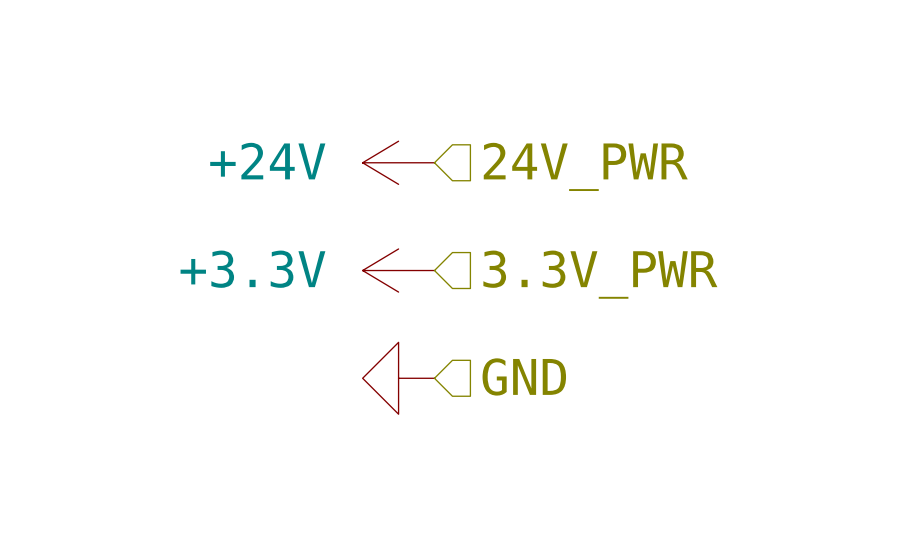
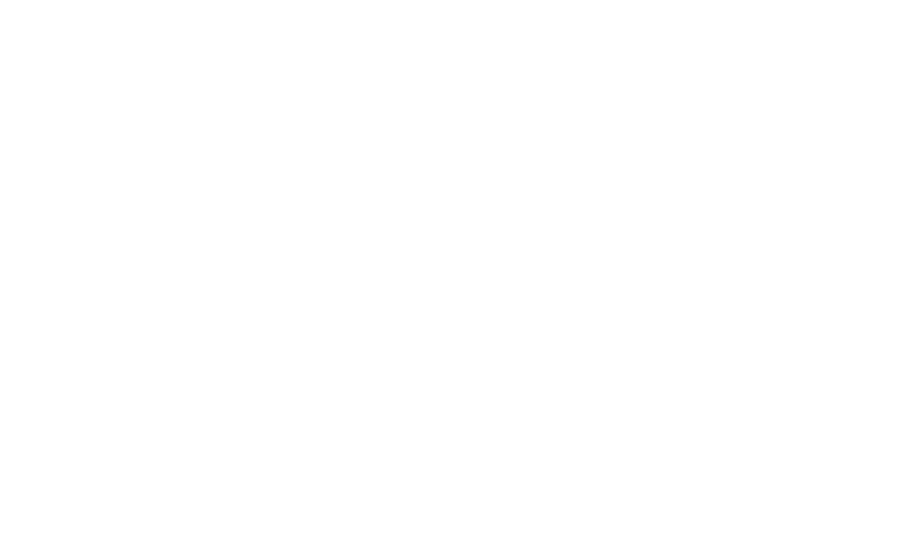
power symbol: +24V (398, 162) -> none
hierarchical label: 24V_PWR (585, 166) -> none
power symbol: +3.3V (398, 270) -> none
hierarchical label: 3.3V_PWR (600, 274) -> none
hierarchical label: GND (524, 376) -> none
power symbol: (398, 378) -> none

